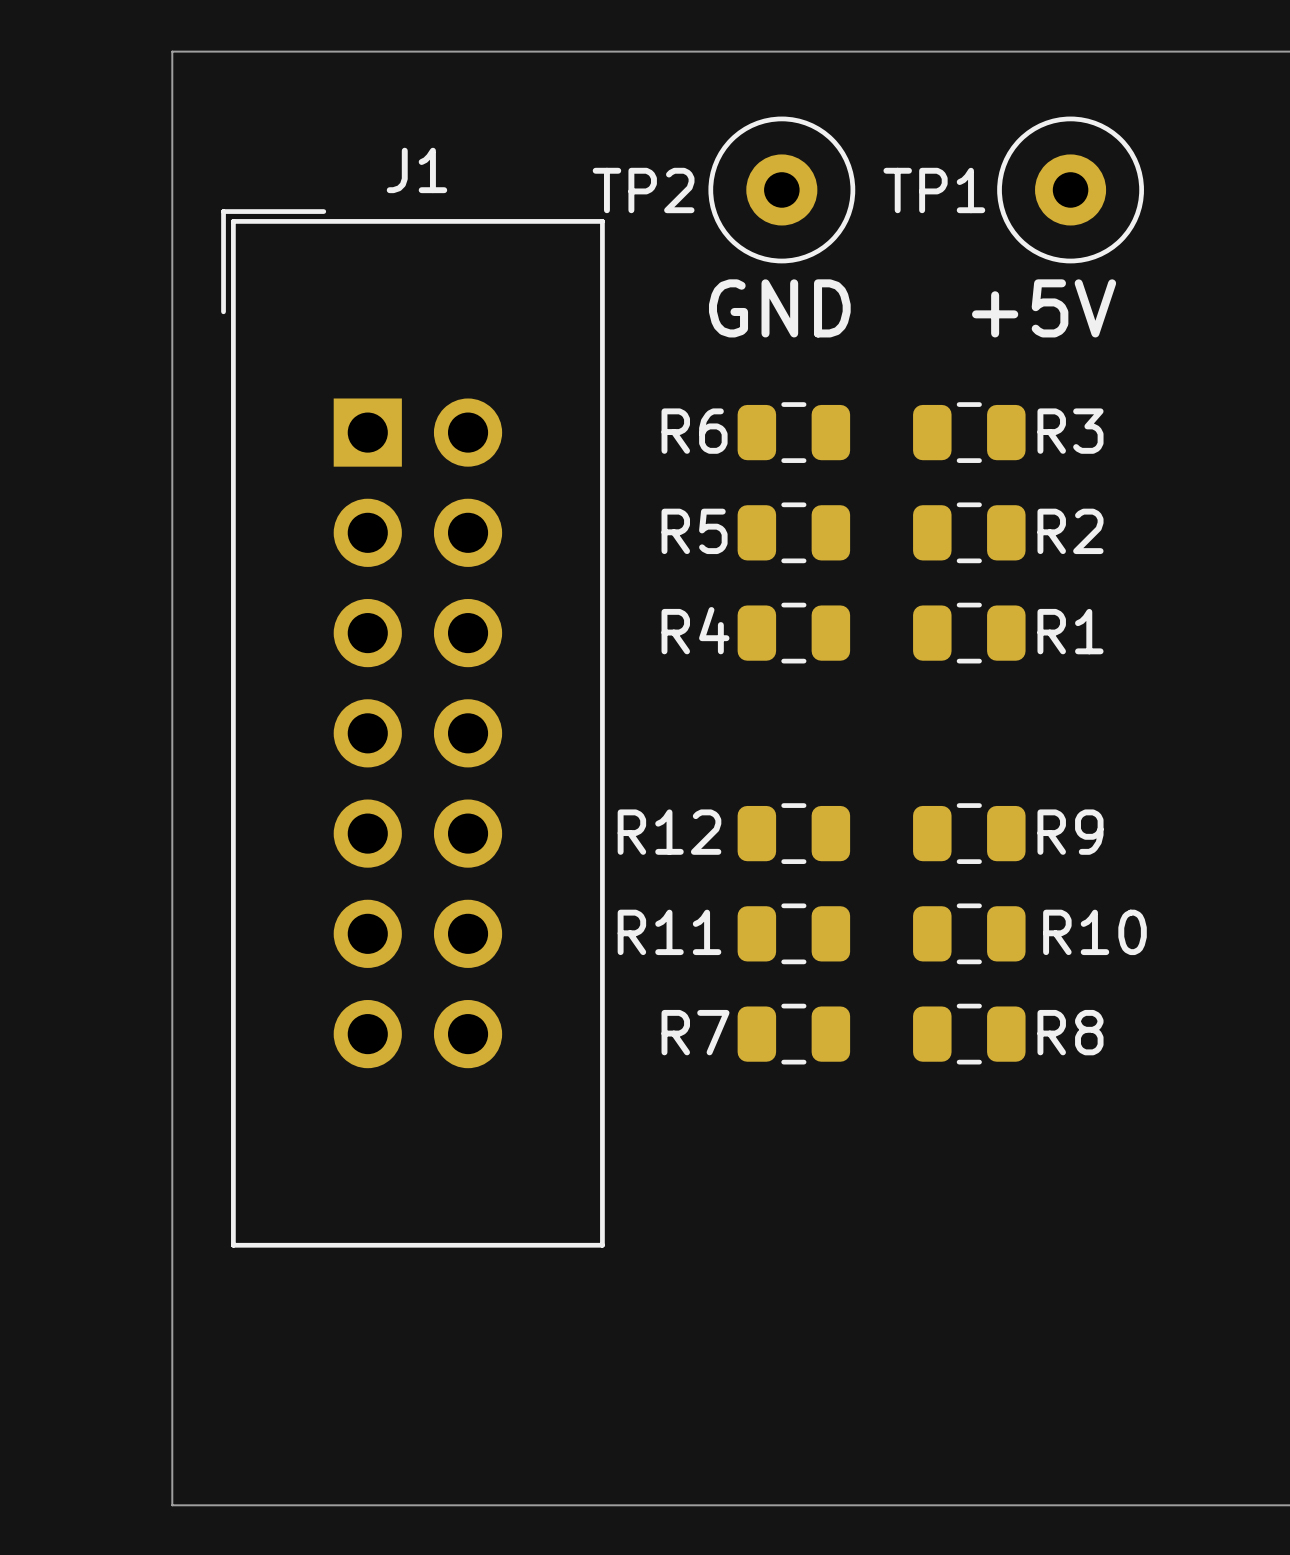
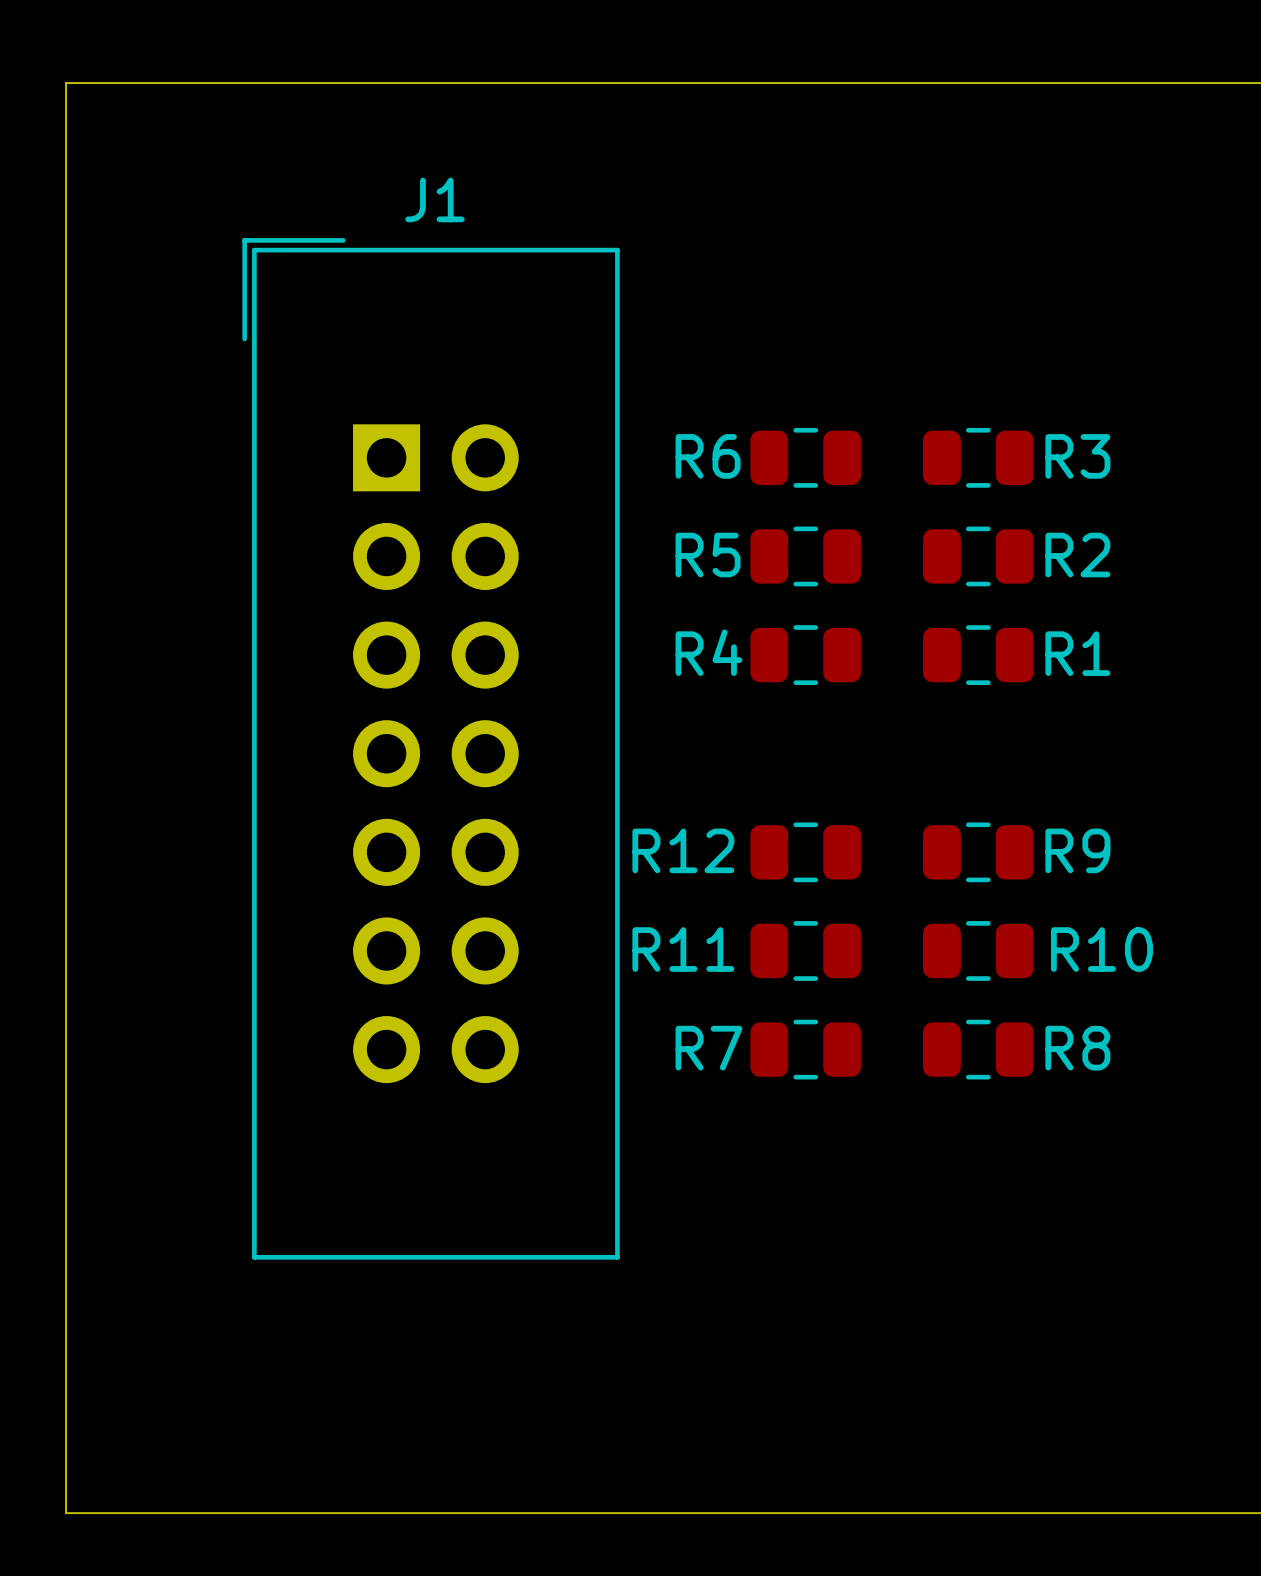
board edge: (172, 51) (172, 1505) -> (194, 83) (66, 83) (66, 1513) (194, 1513)
TP2: (781, 189) -> none
TP1: (1070, 189) -> none
text: GND (779, 308) -> none
text: +5V (1044, 308) -> none

